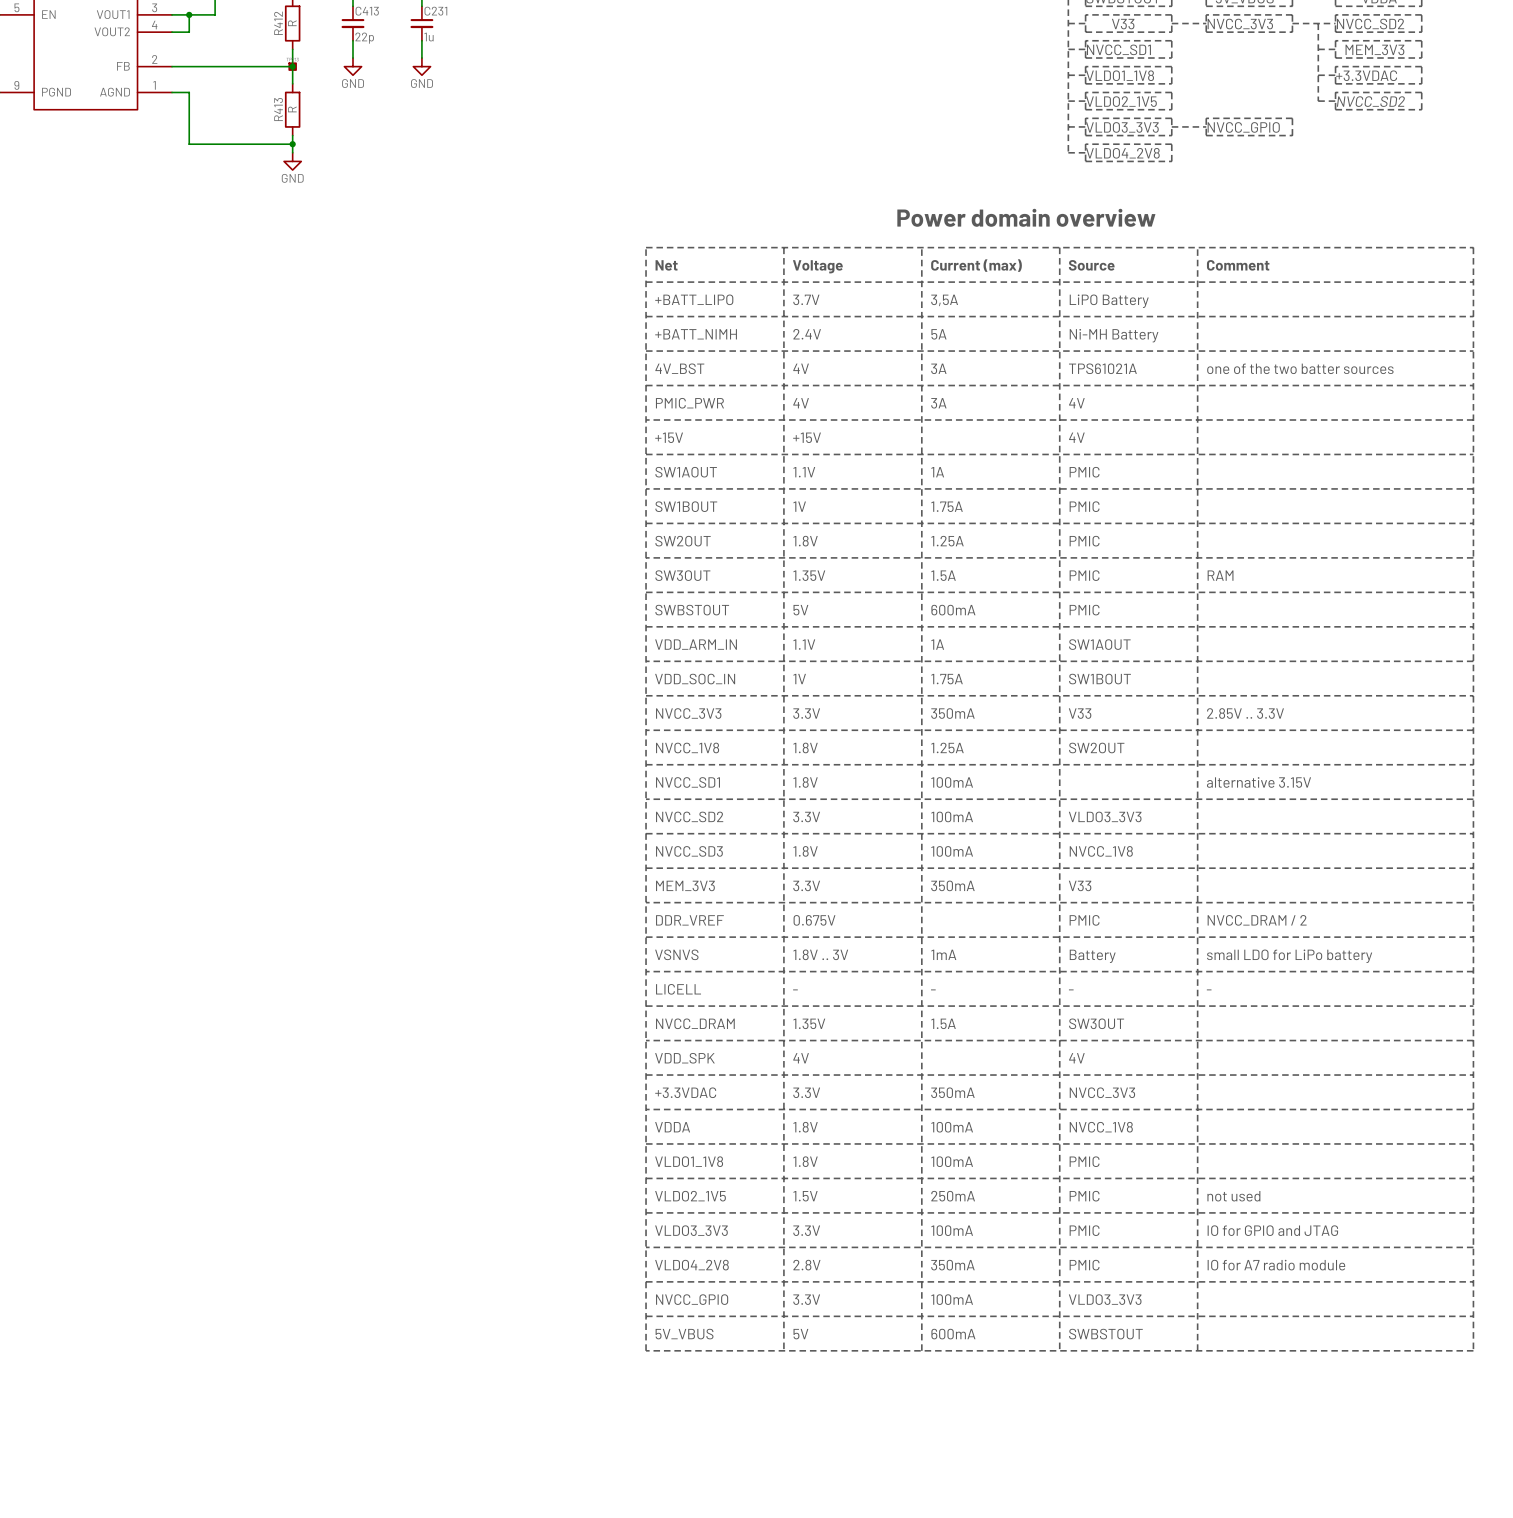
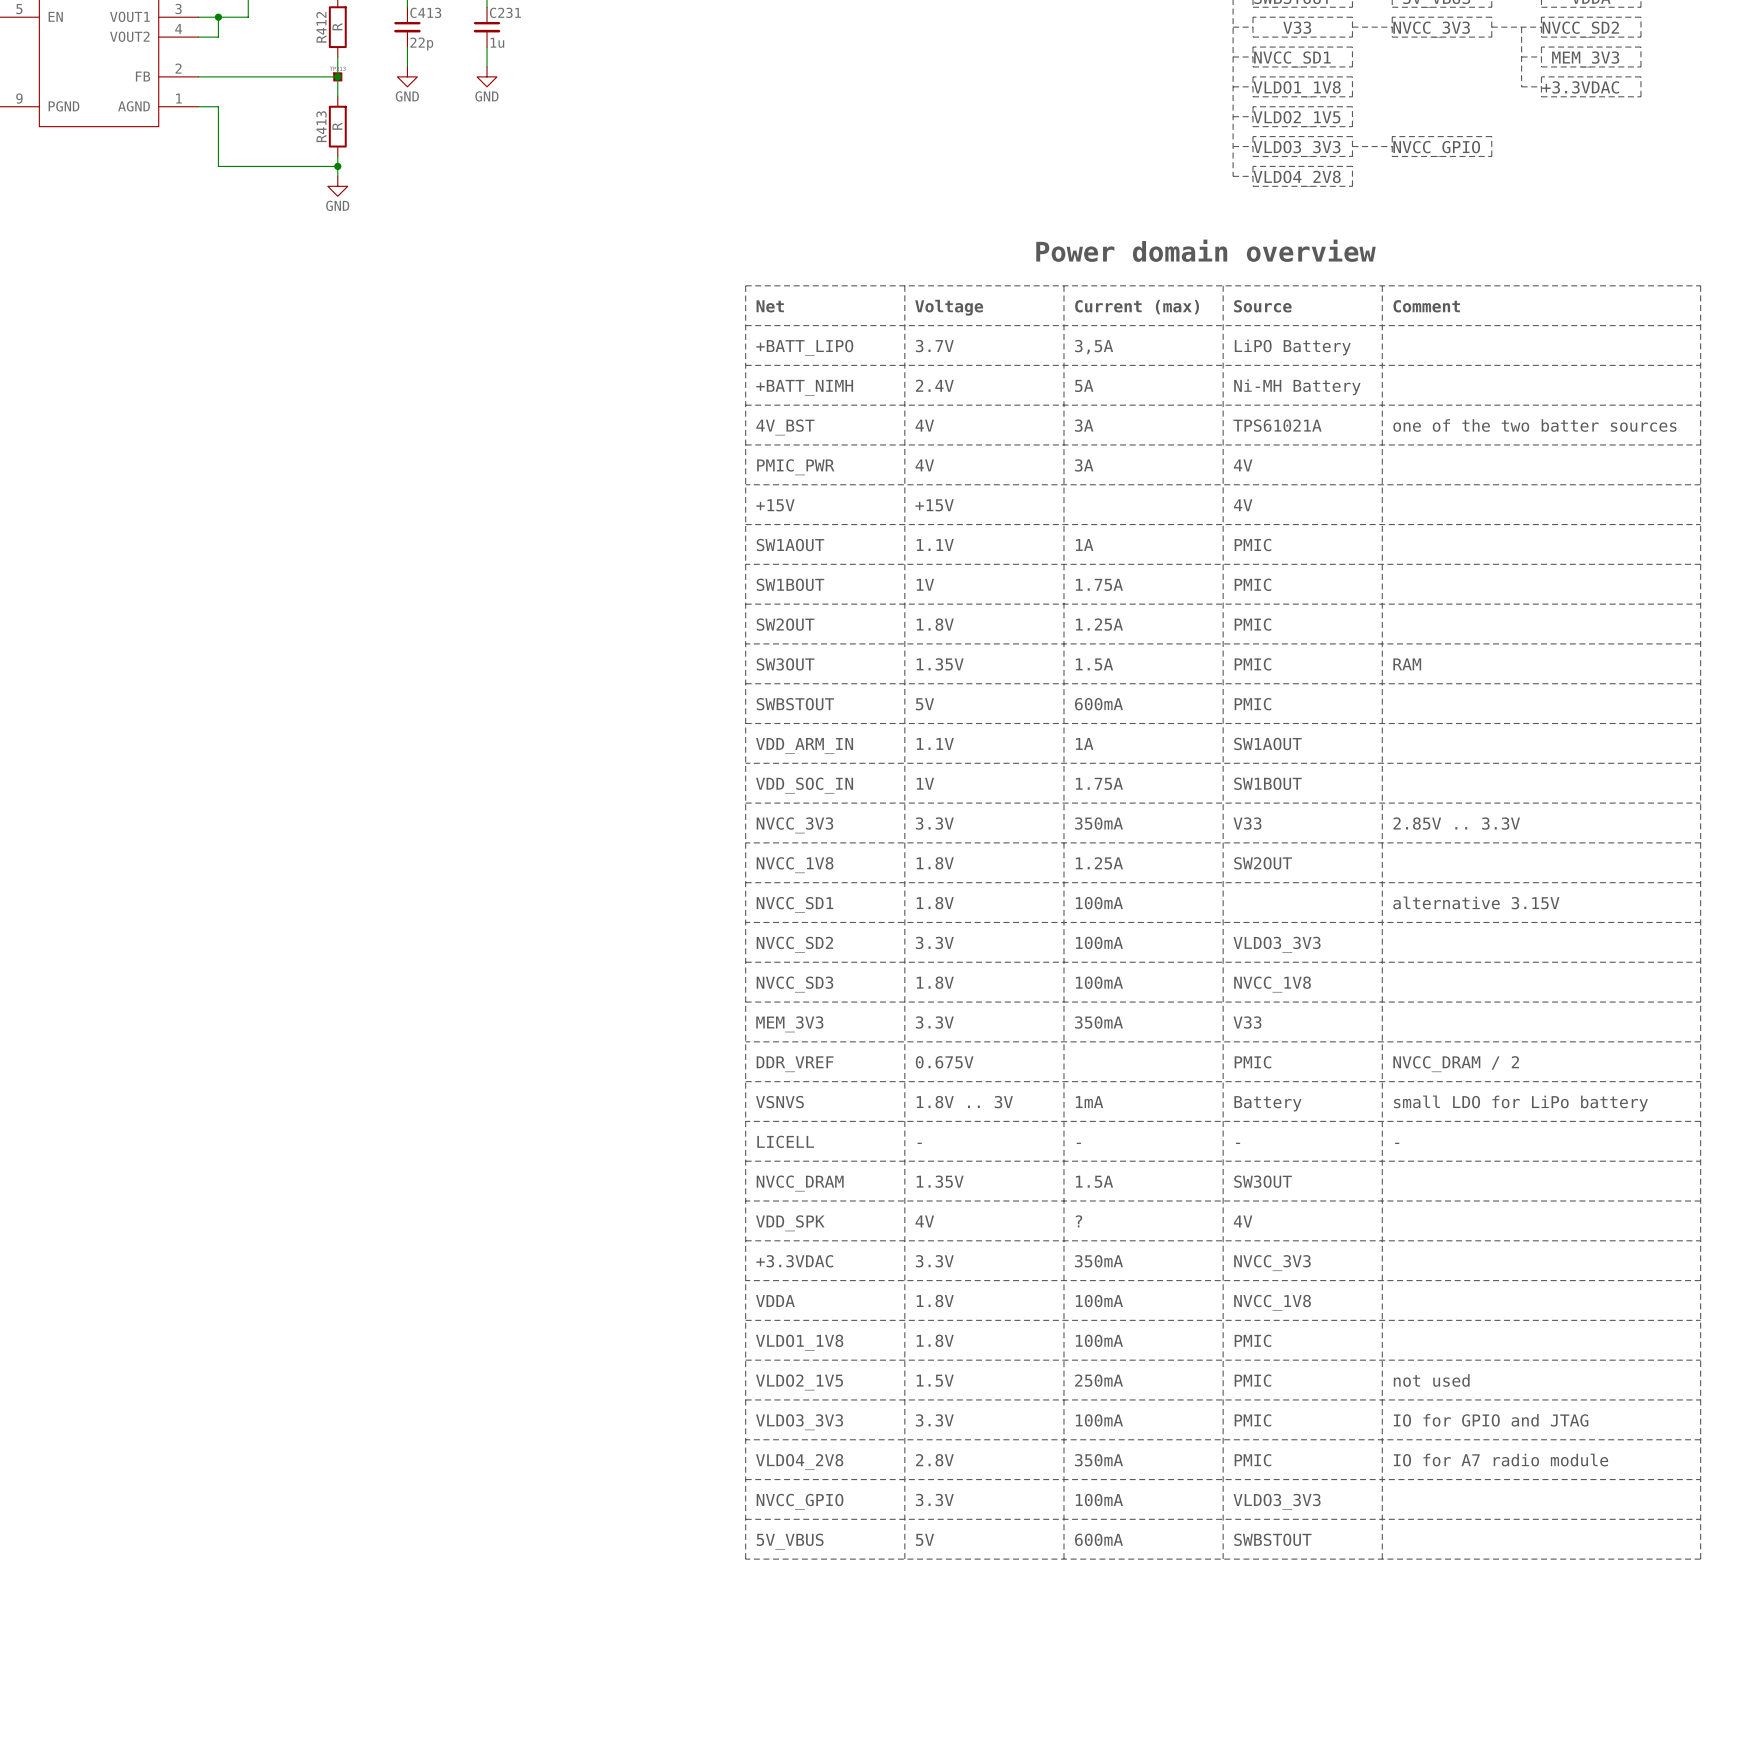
line: (1318, 75) (1318, 101) (1335, 101) -> none
line: (1335, 92) (1335, 109) (1421, 109) (1421, 92) (1335, 92) -> none
text: NVCC_SD2 (1370, 101) -> none
text: none -> ? (1079, 1221)

